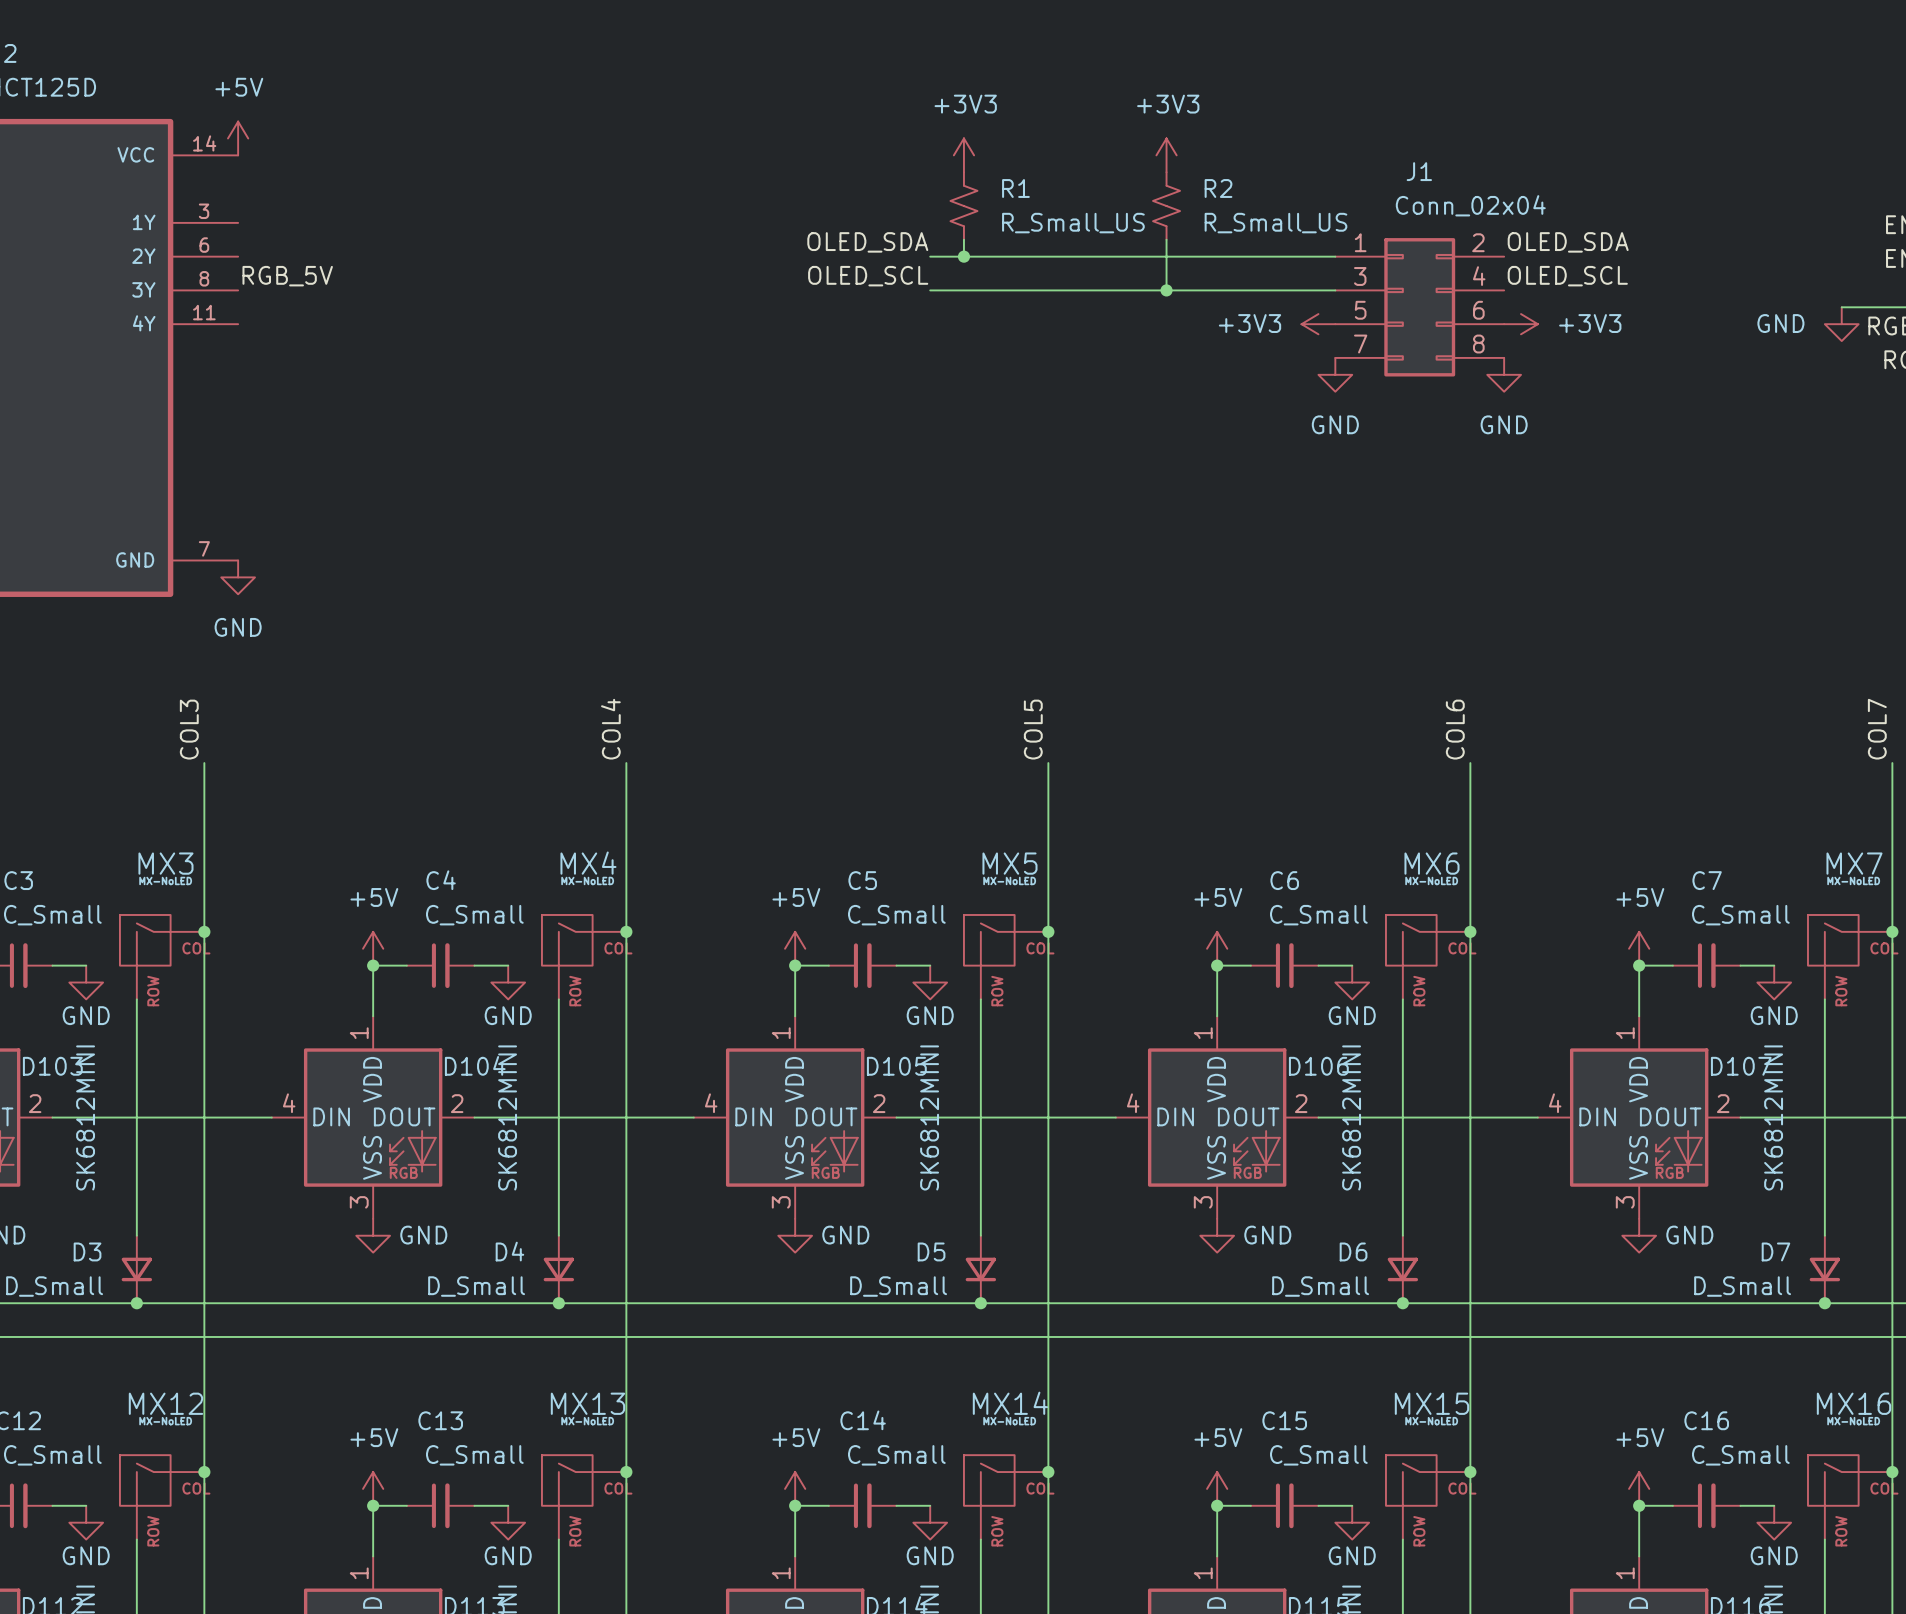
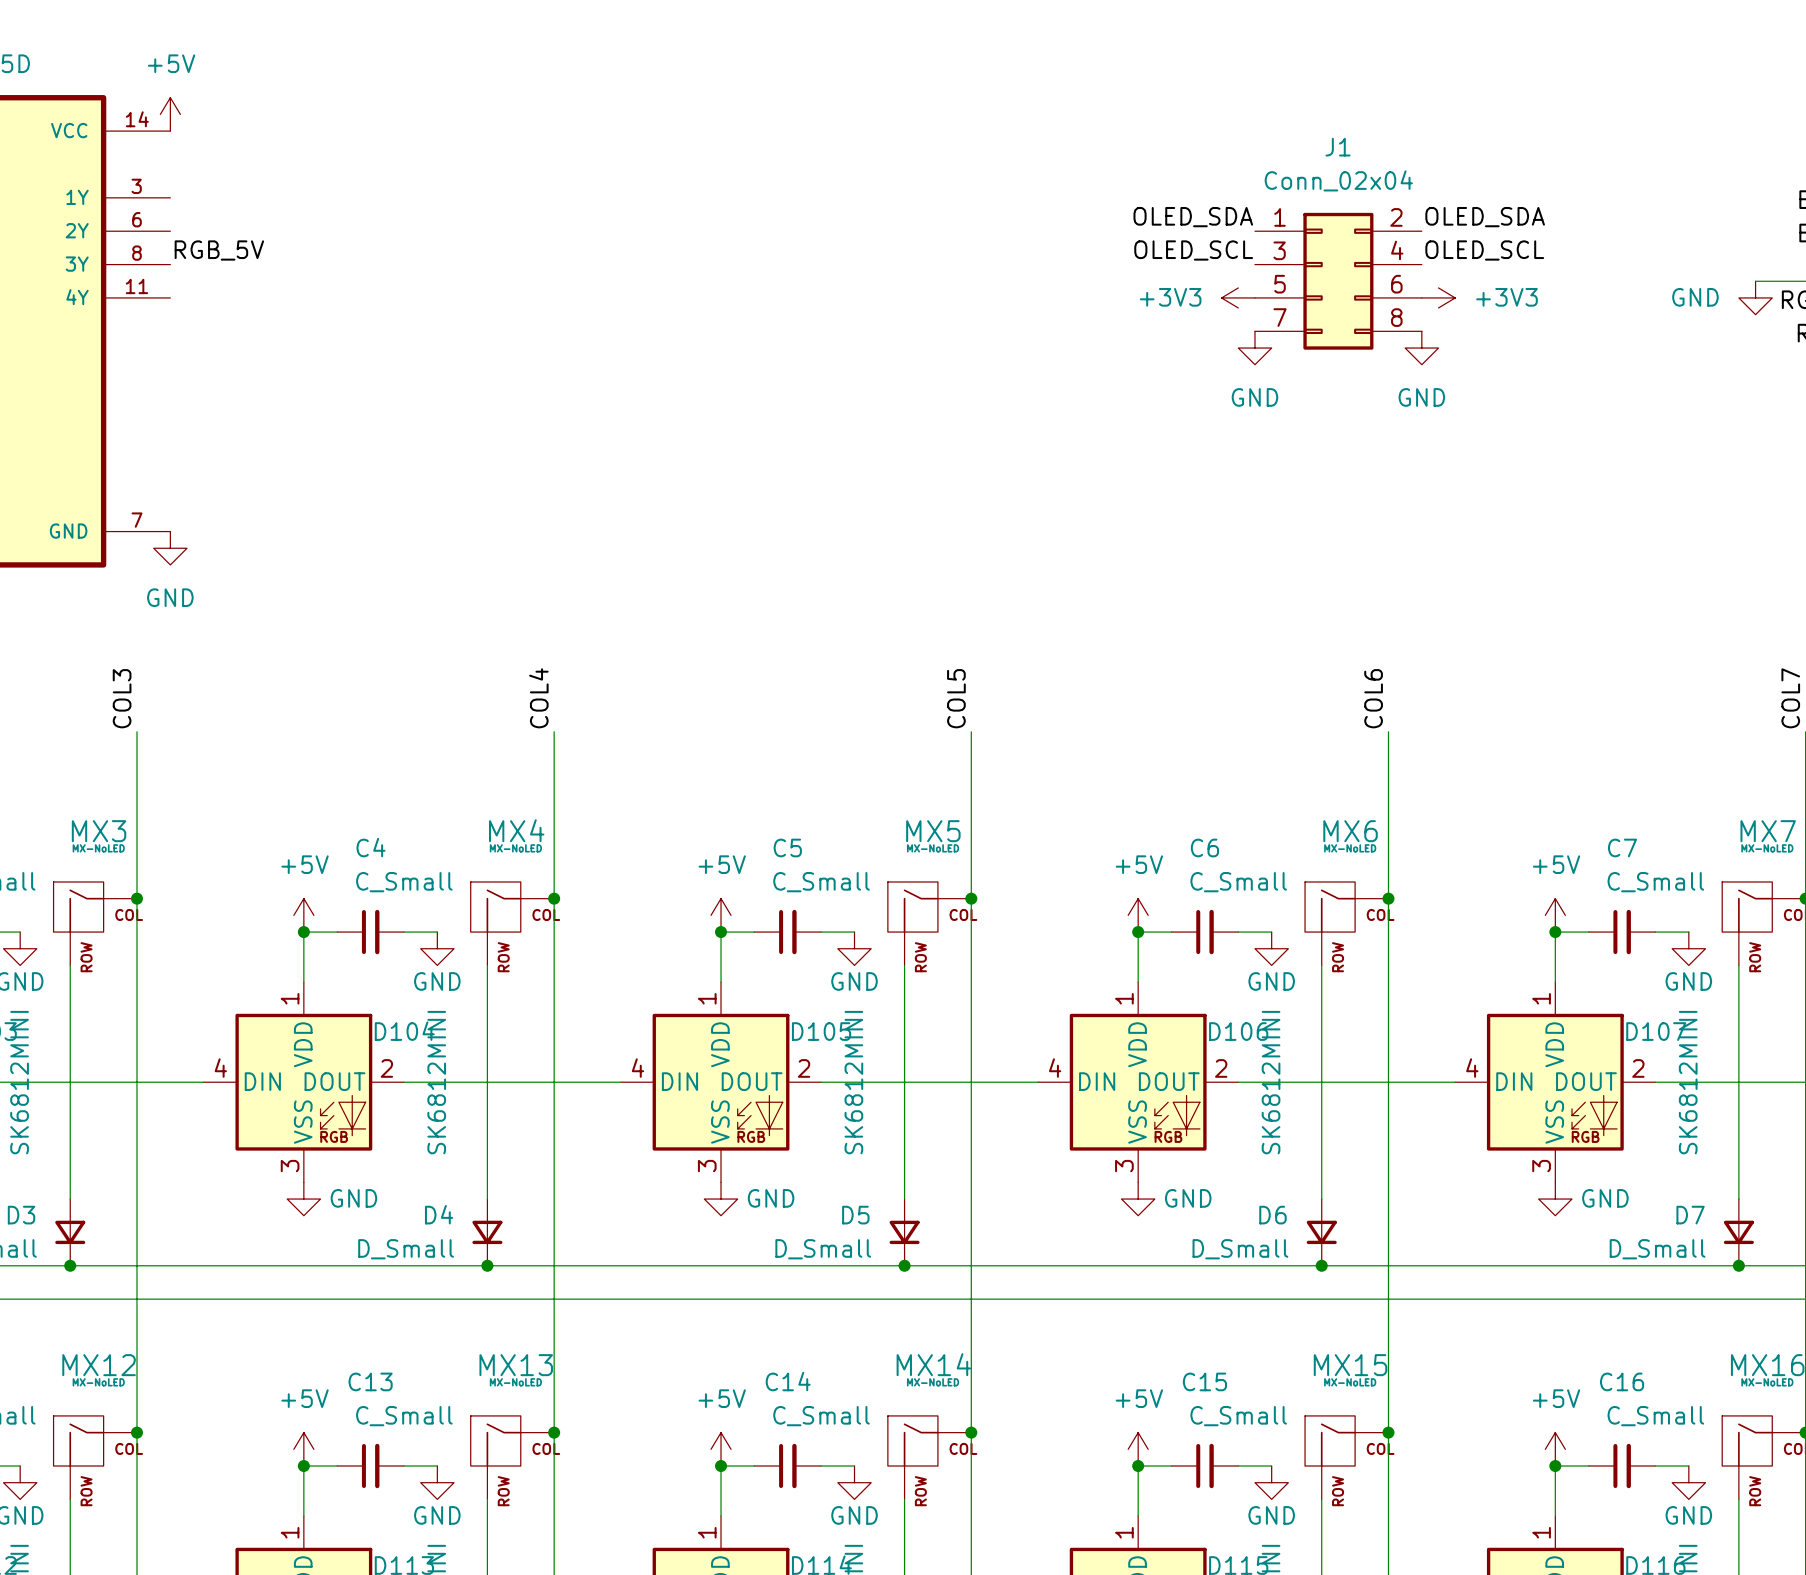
power symbol: +3V3 (963, 155) -> none
power symbol: +3V3 (1166, 155) -> none
J1 value position: Conn_02x04 (1470, 205) -> Conn_02x04 (1338, 180)
R1: R_Small_US (963, 206) -> none
R2: R_Small_US (1166, 206) -> none
wire: (963, 239) (963, 256) -> none
wire: (1166, 239) (1166, 290) -> none
label: OLED_SDA (867, 242) -> none
label: none -> OLED_SDA (1193, 217)
wire: (930, 256) (1335, 256) -> none
junction: (963, 256) -> none
label: OLED_SCL (868, 276) -> none
label: none -> OLED_SCL (1193, 250)
wire: (930, 290) (1335, 290) -> none
junction: (1166, 290) -> none

